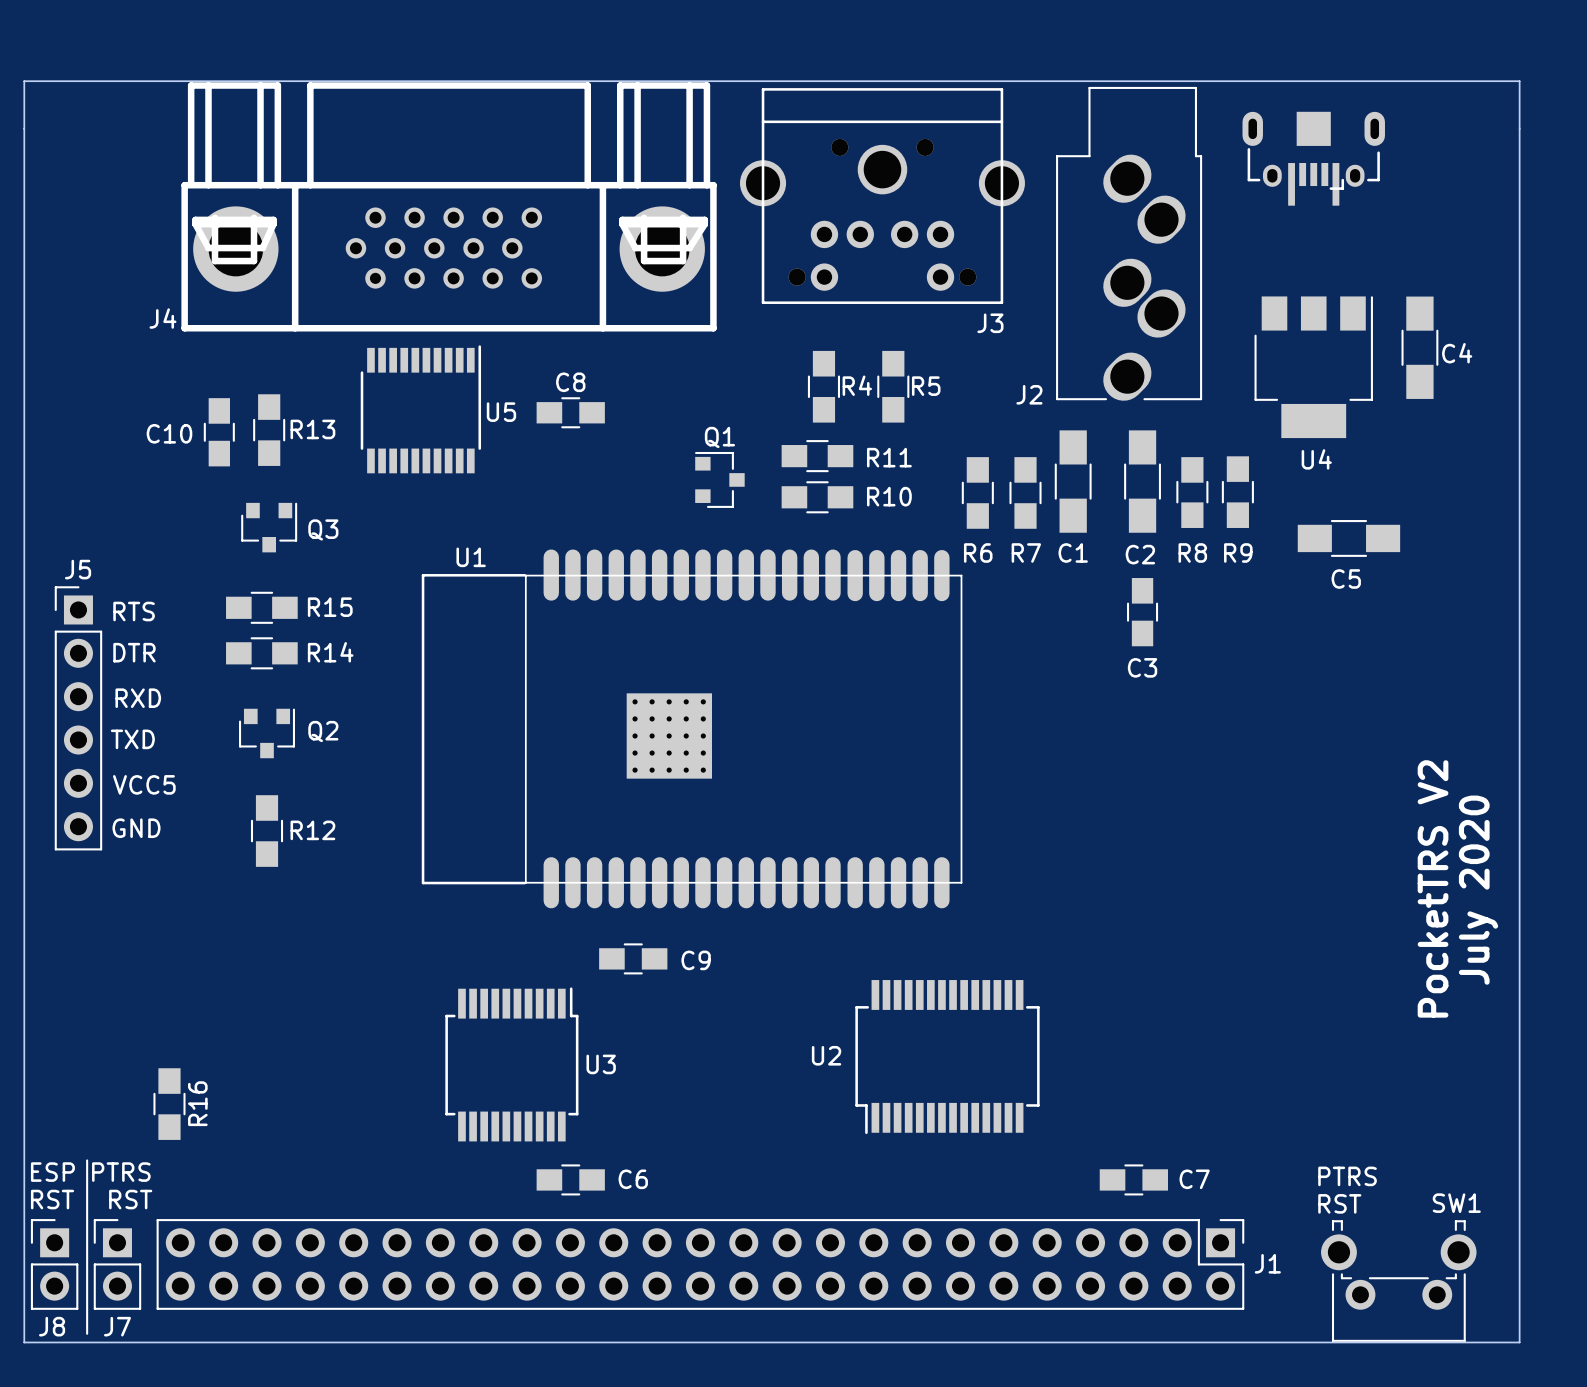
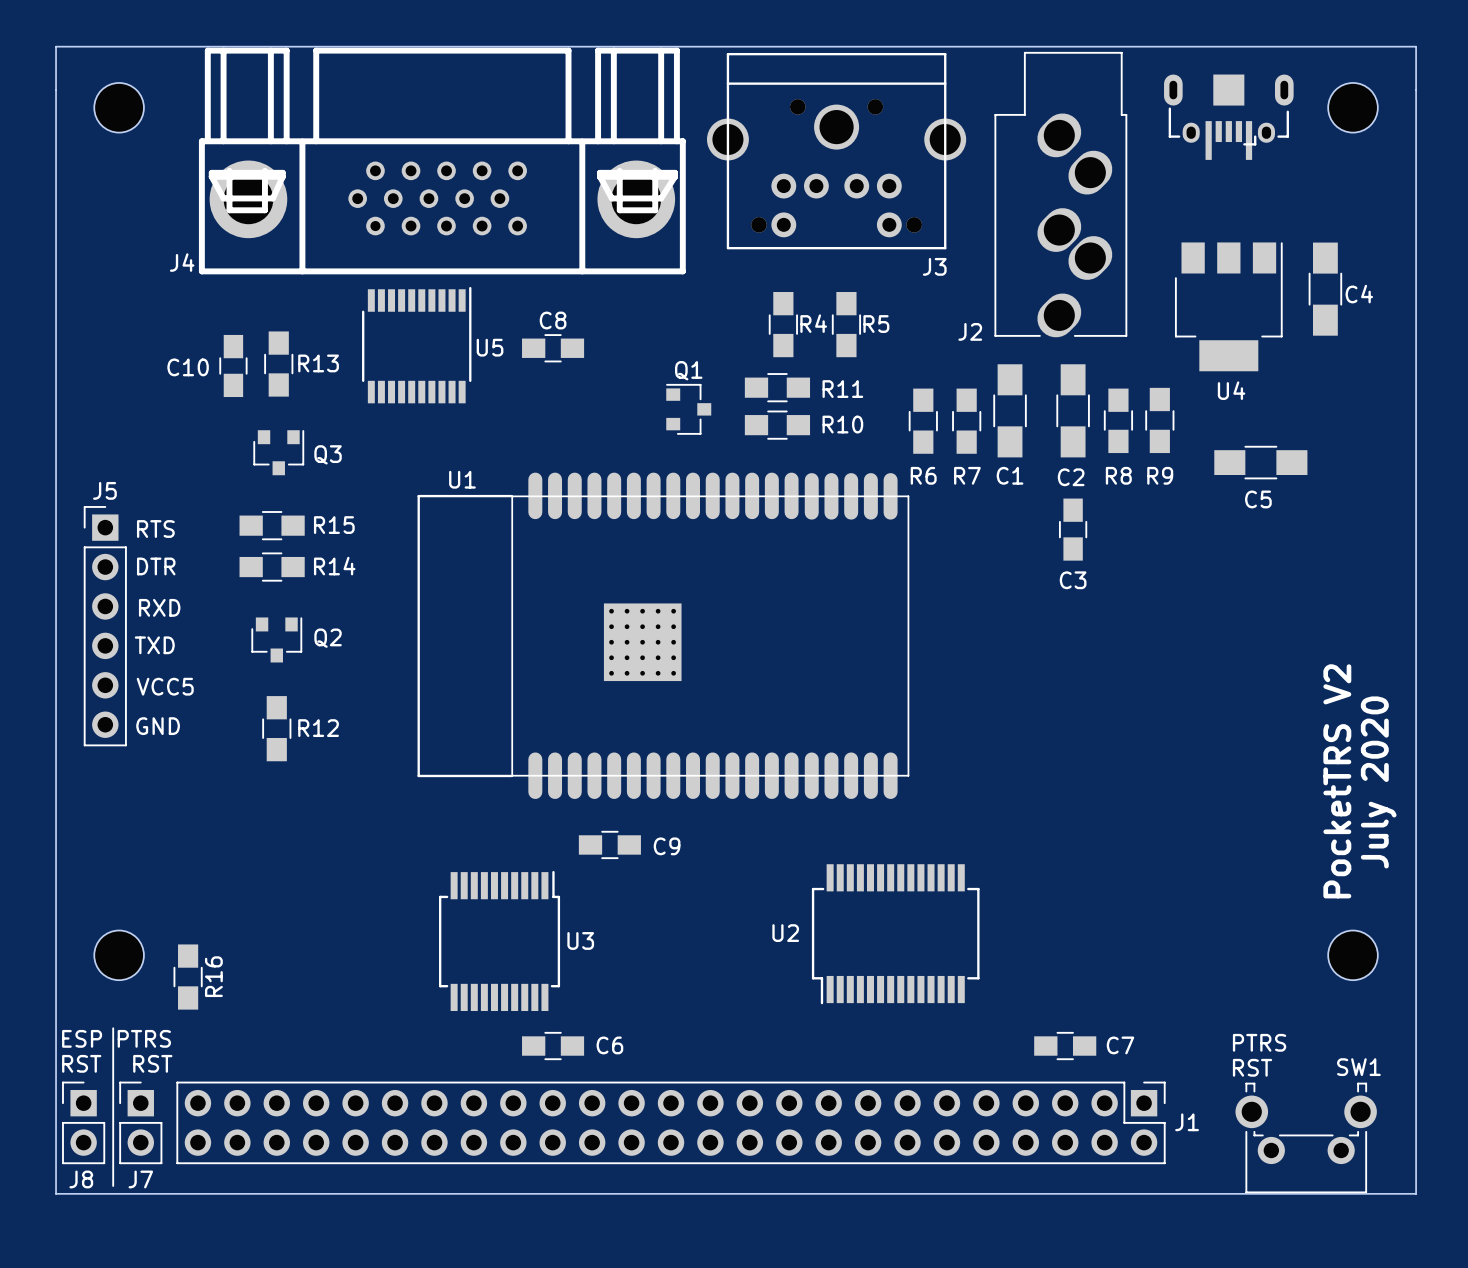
part: none -> (119, 107)
part: none -> (1353, 107)
part: none -> (119, 955)
part: none -> (1353, 955)

